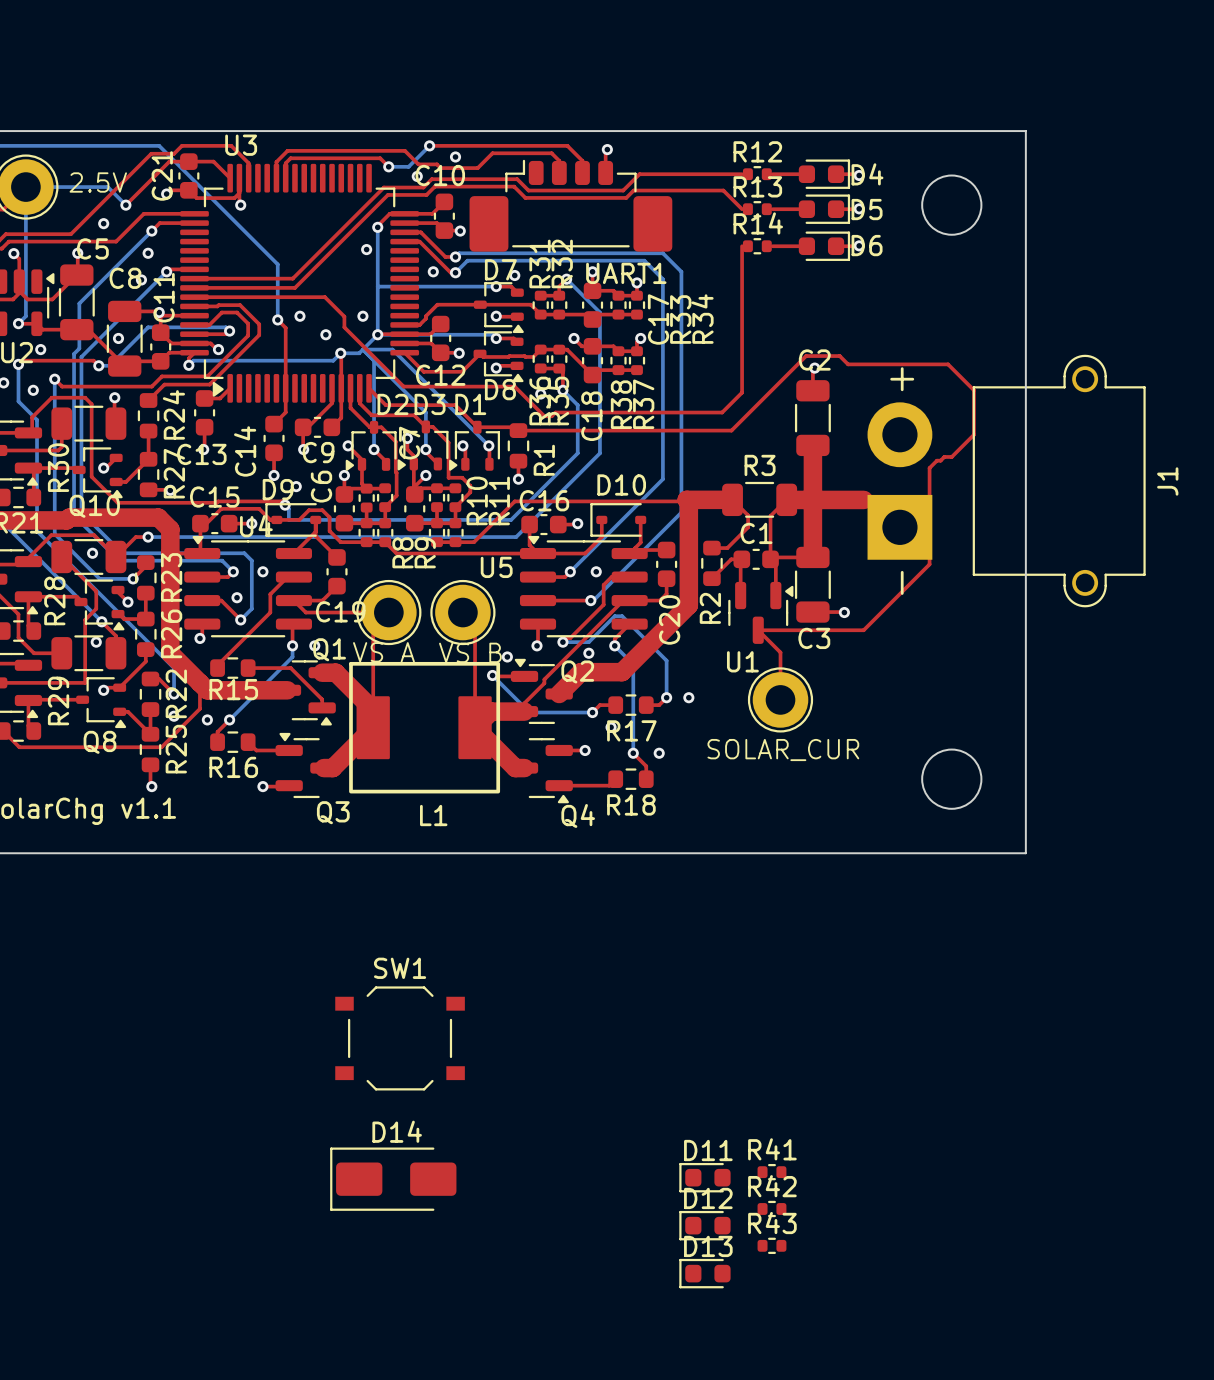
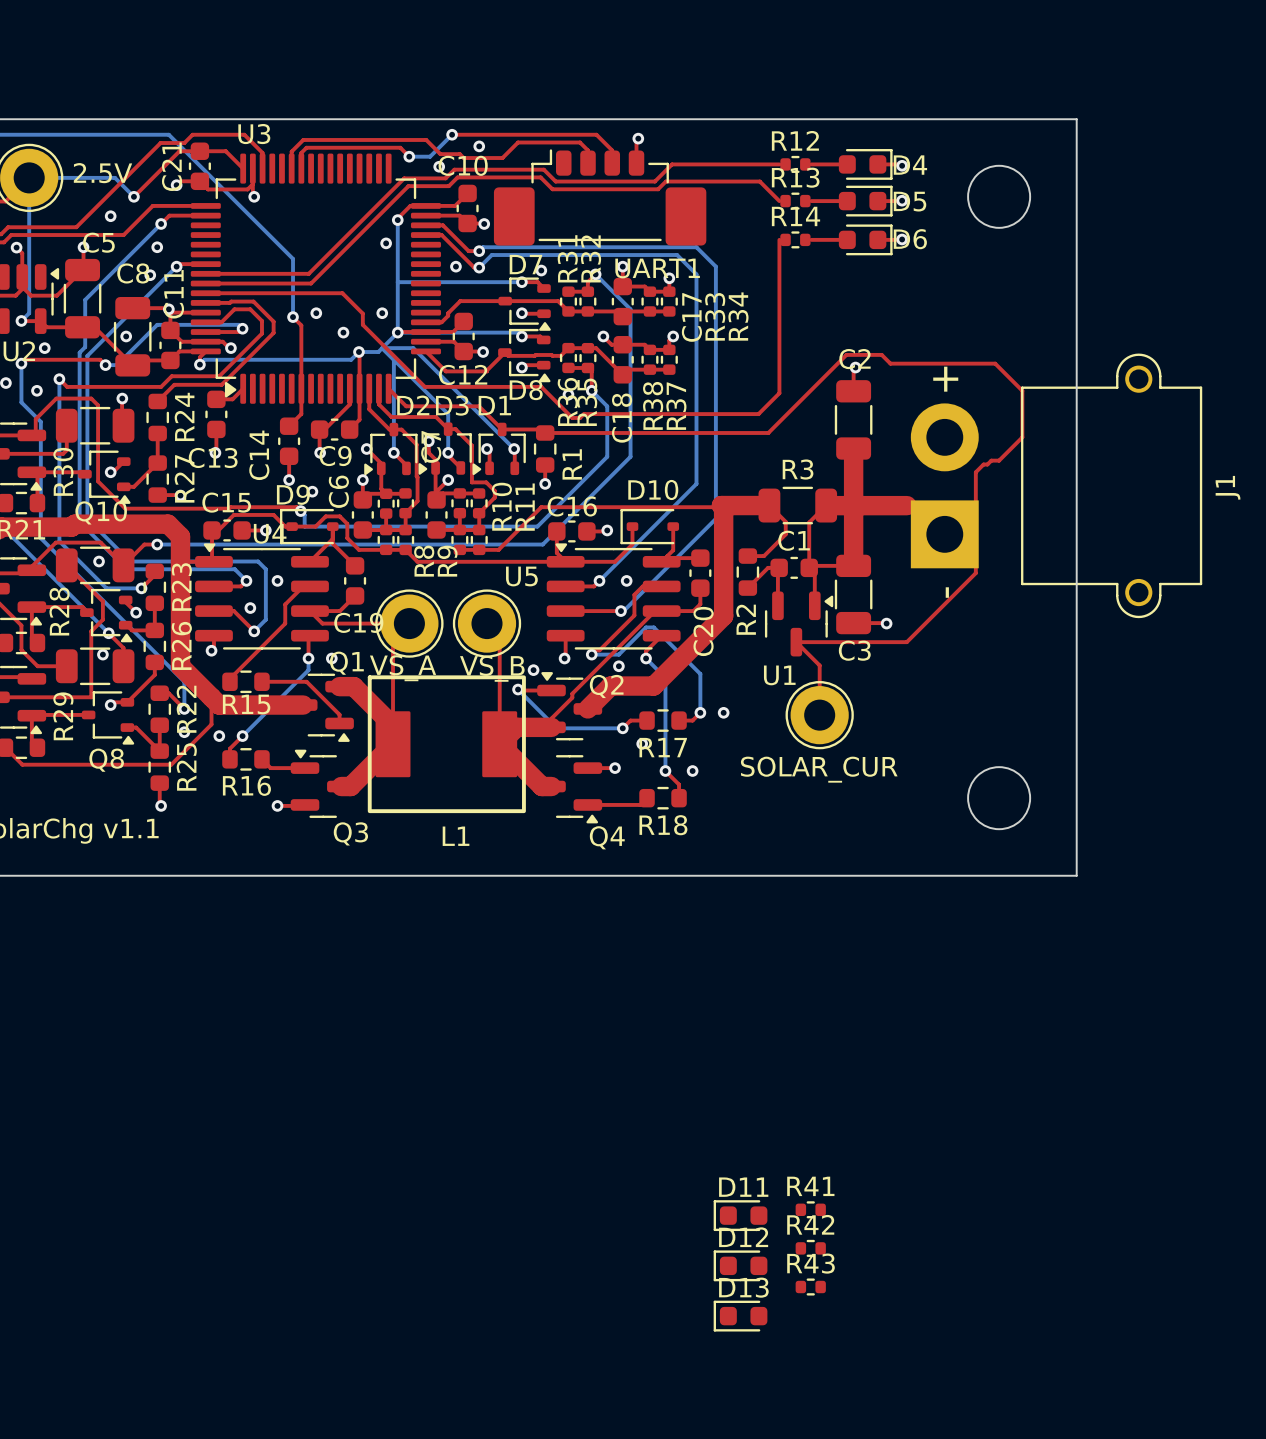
SW1: (400, 1038) -> none
D14: (393, 1179) -> none

